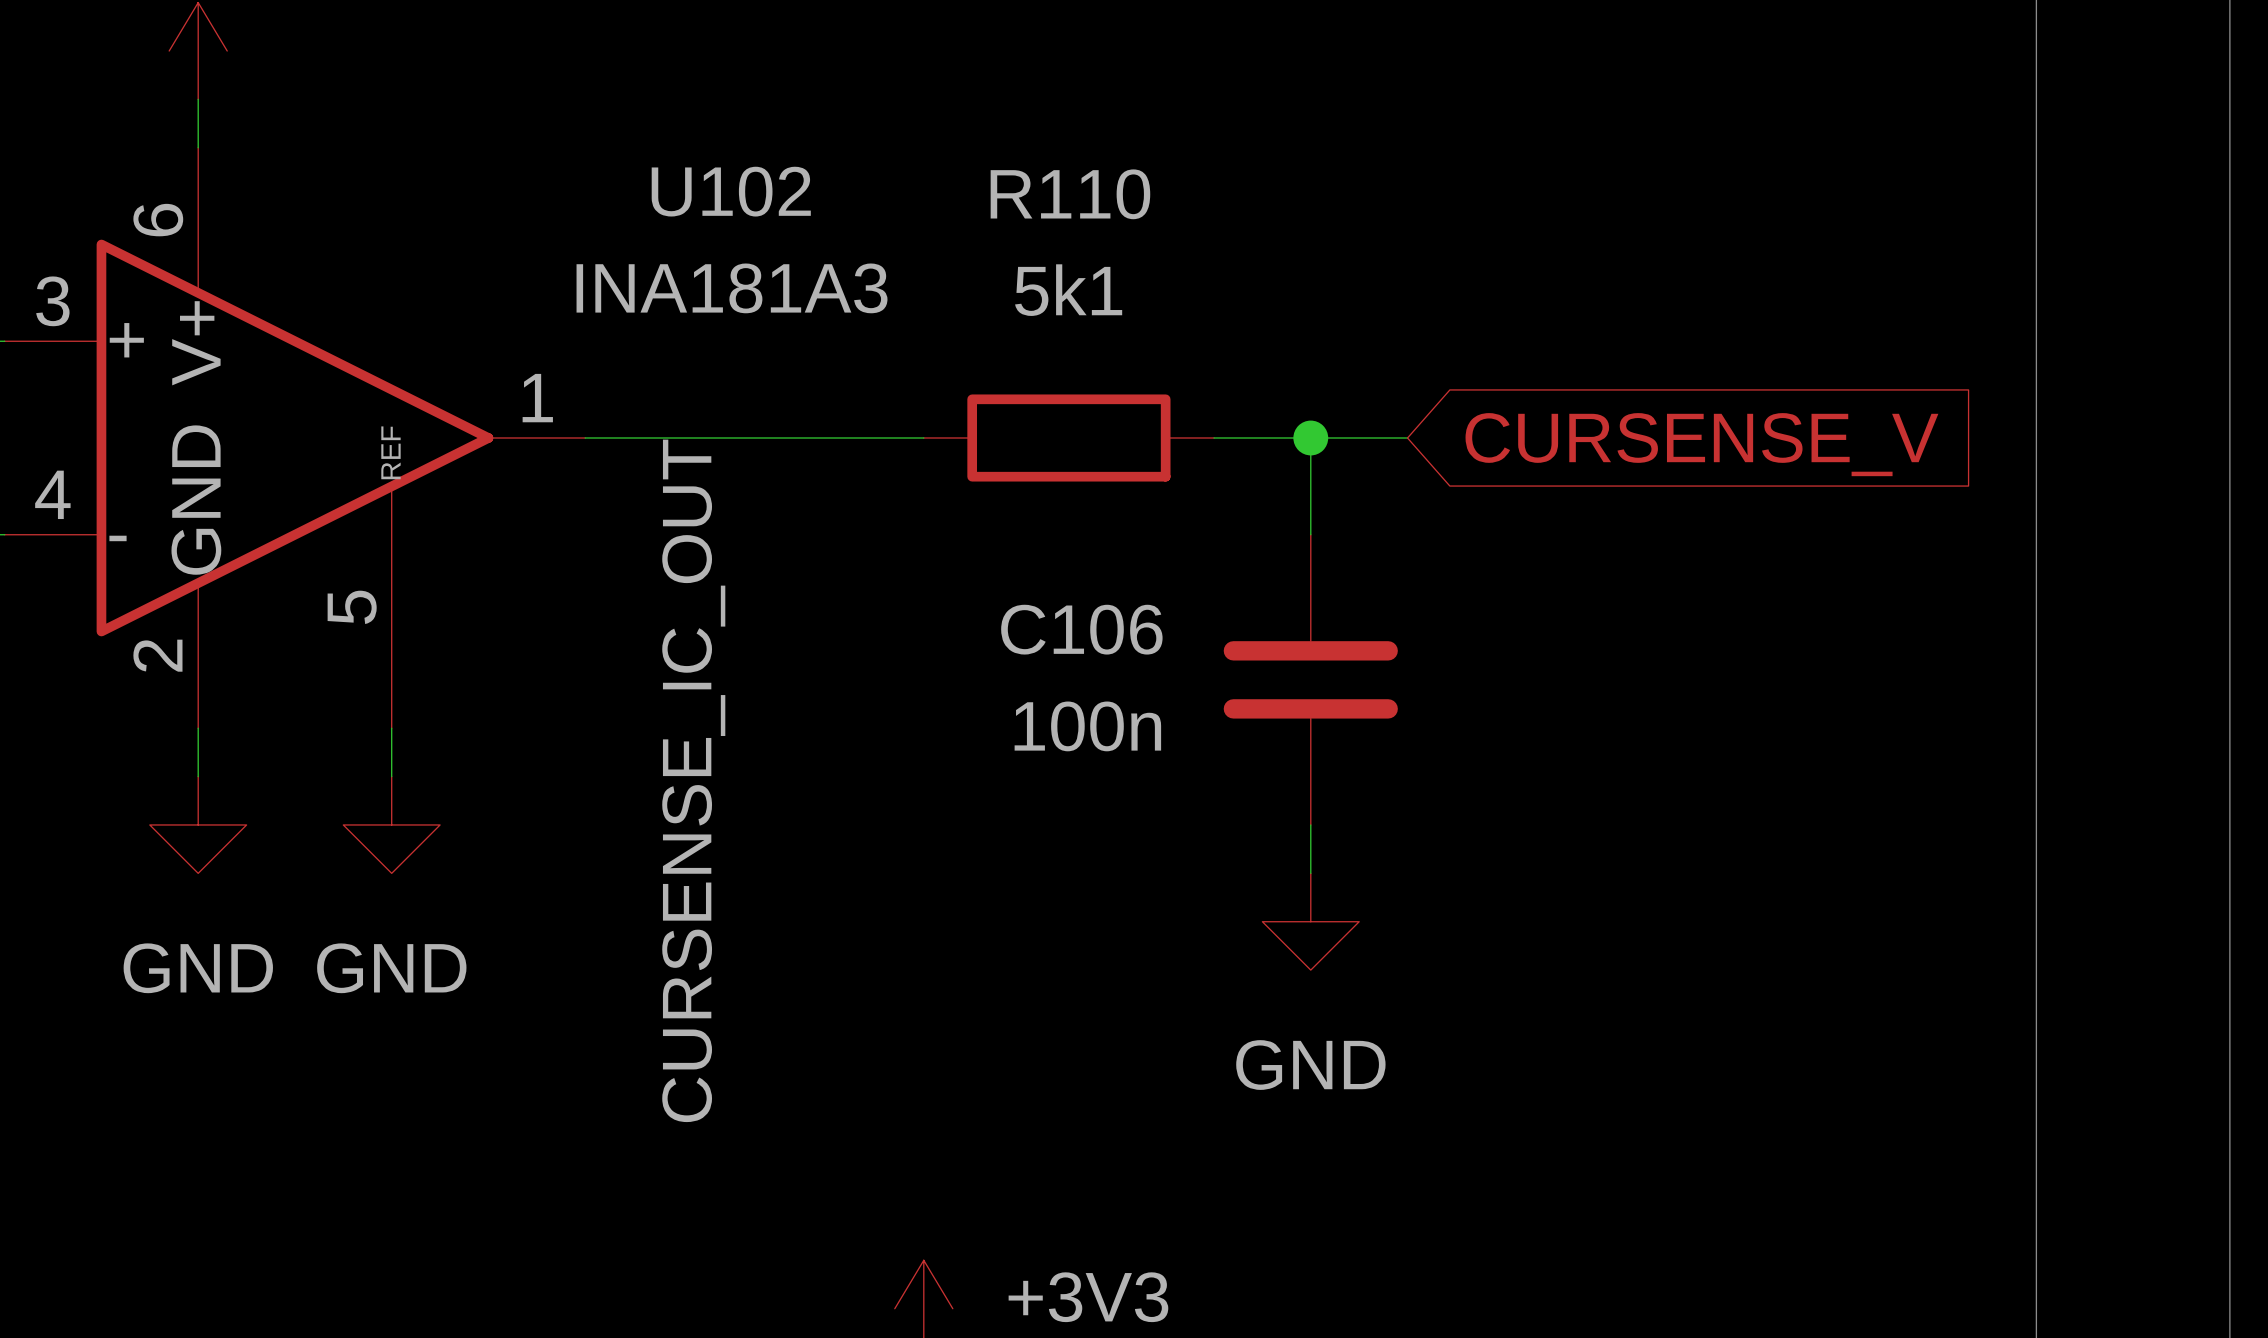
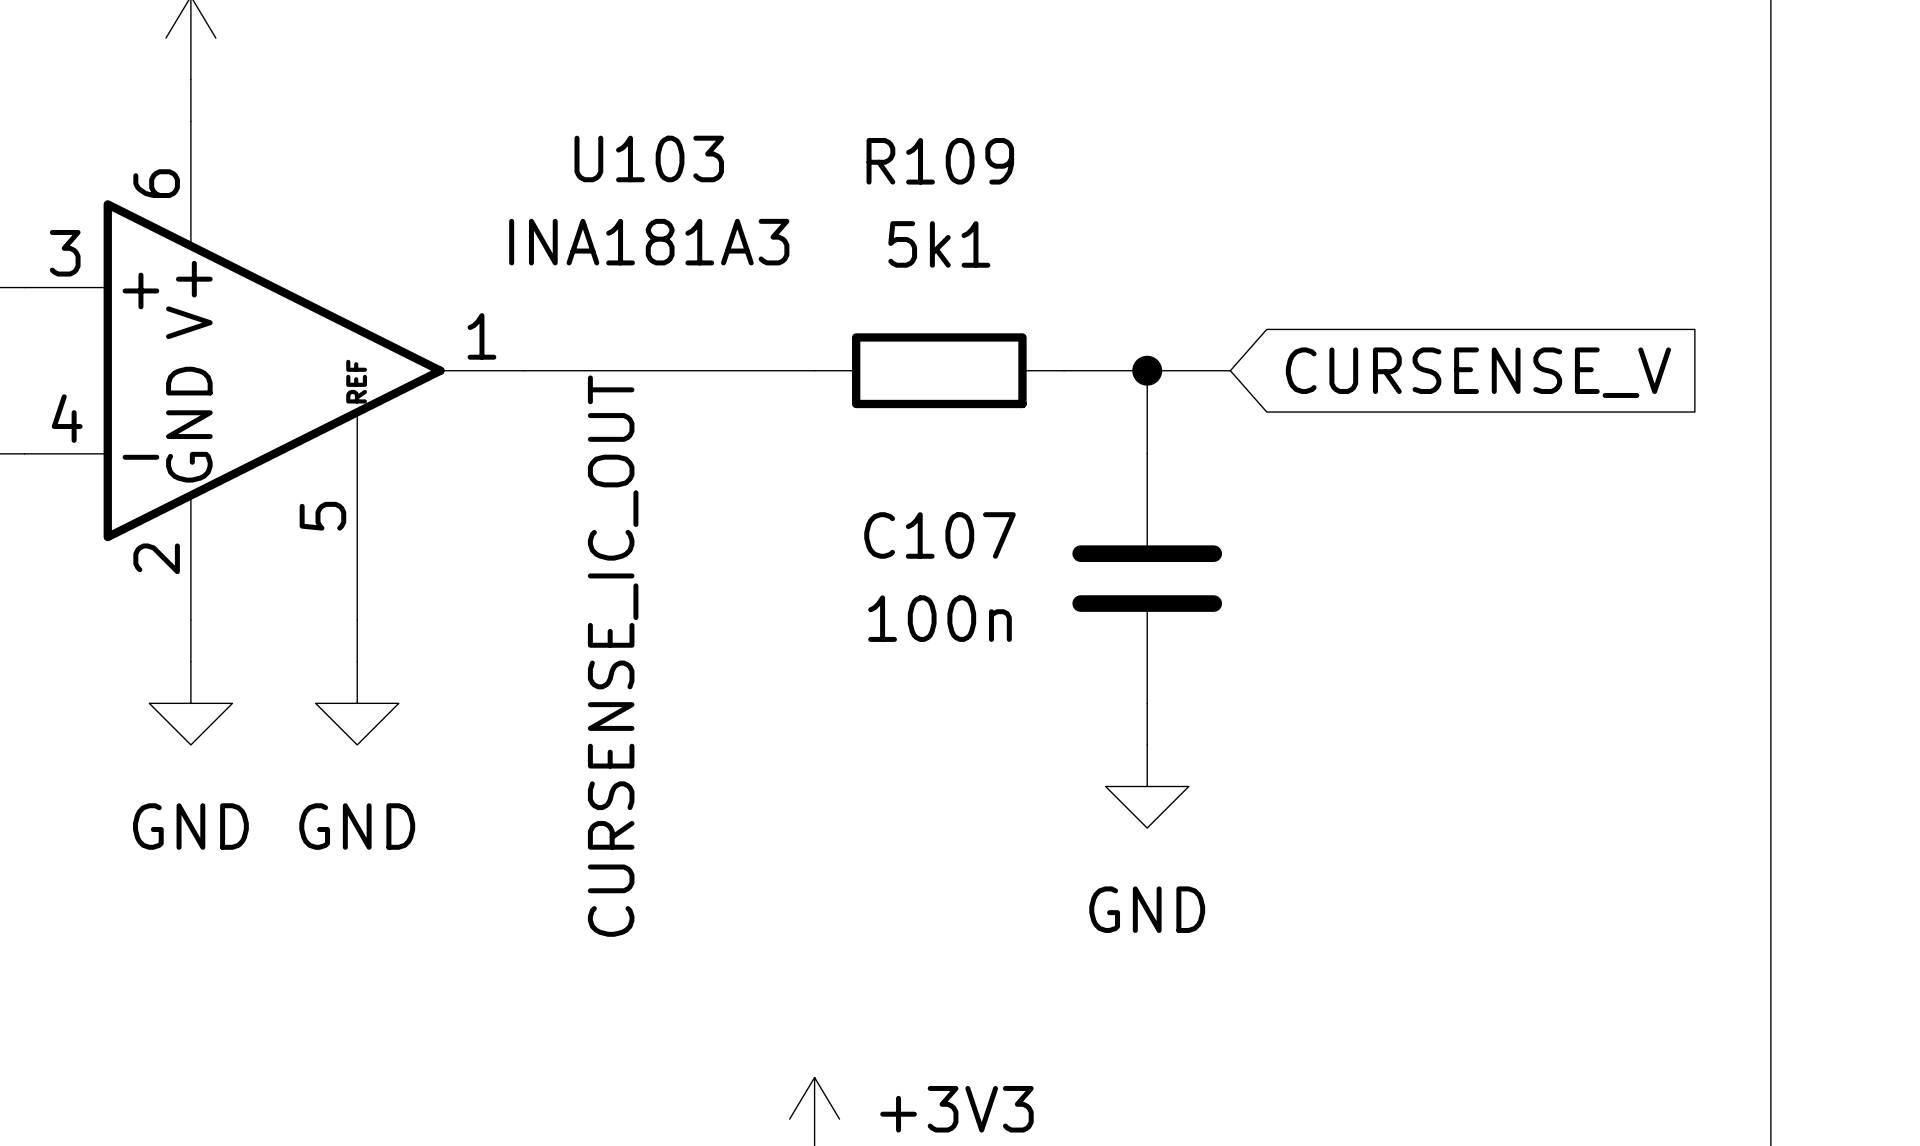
U102 name: U102 (731, 191) -> U103 (649, 158)
R110 name: R110 (1070, 194) -> R109 (940, 161)
C106 name: C106 (1081, 629) -> C107 (940, 535)

